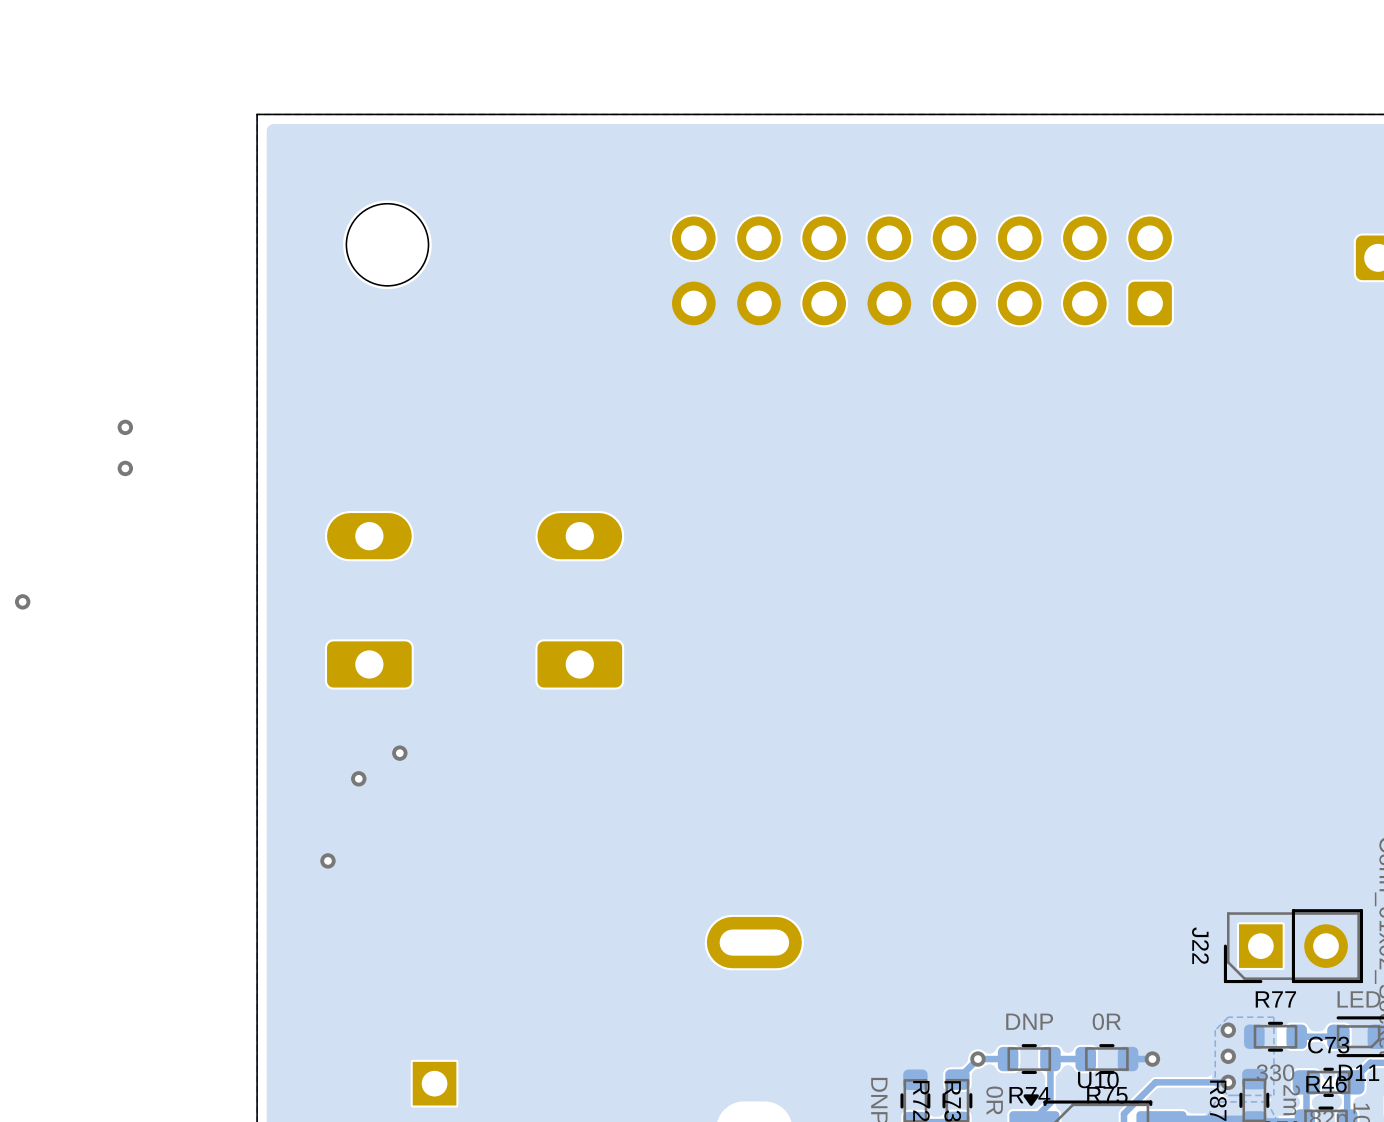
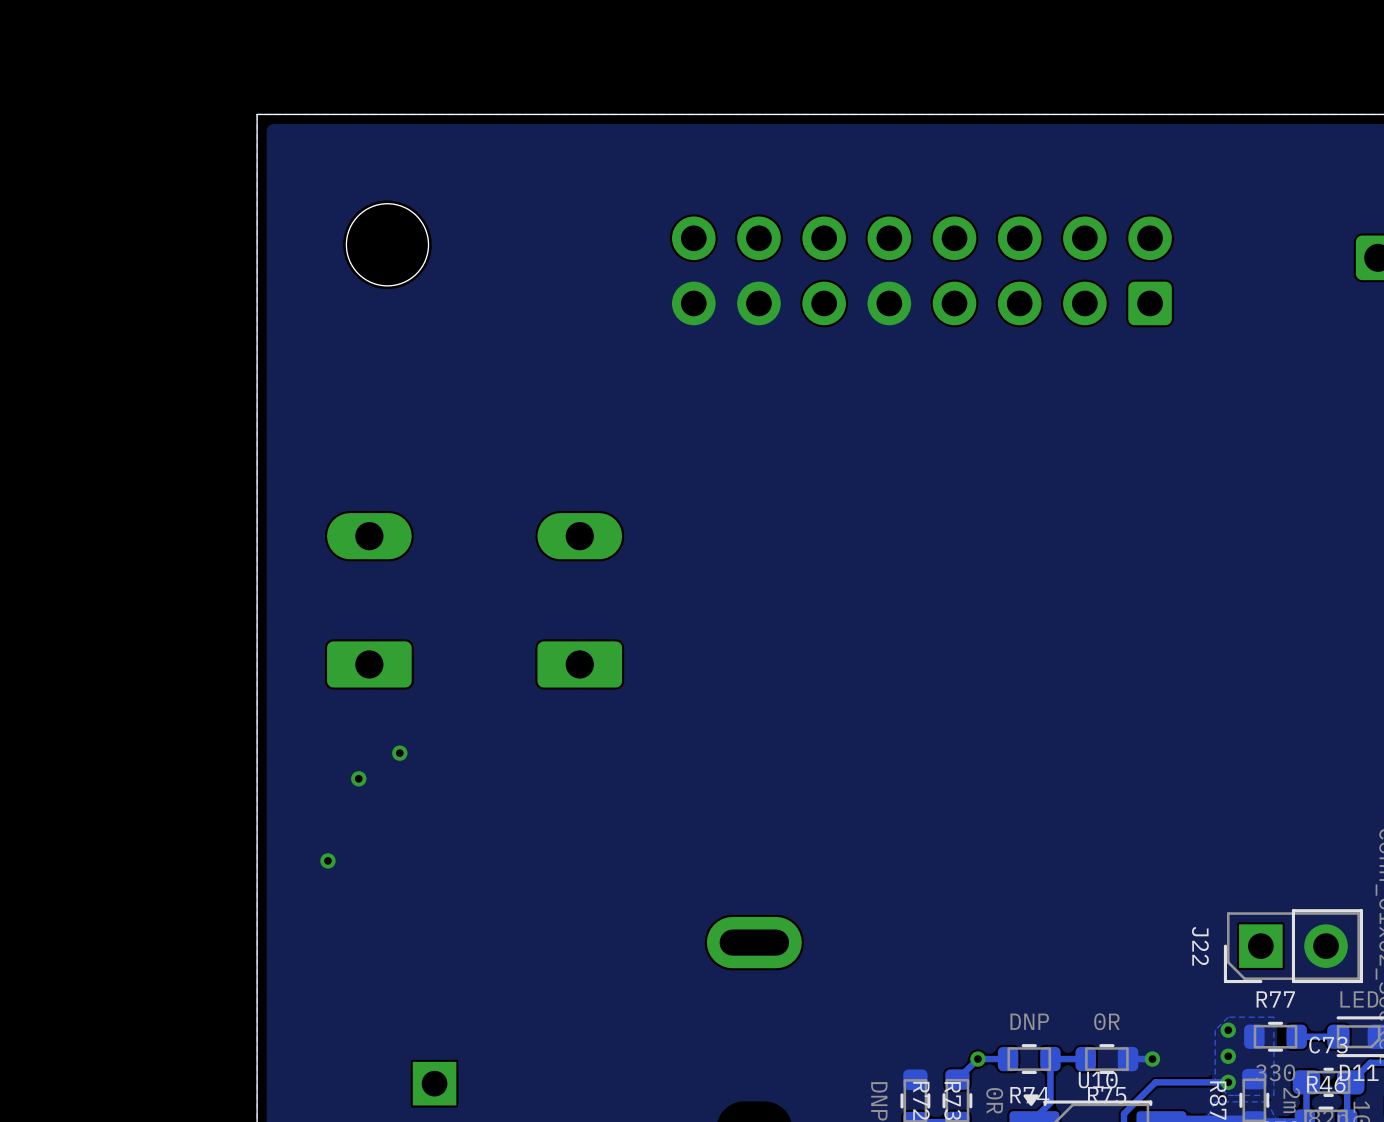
via: (125, 427) -> none
via: (125, 468) -> none
via: (22, 601) -> none

